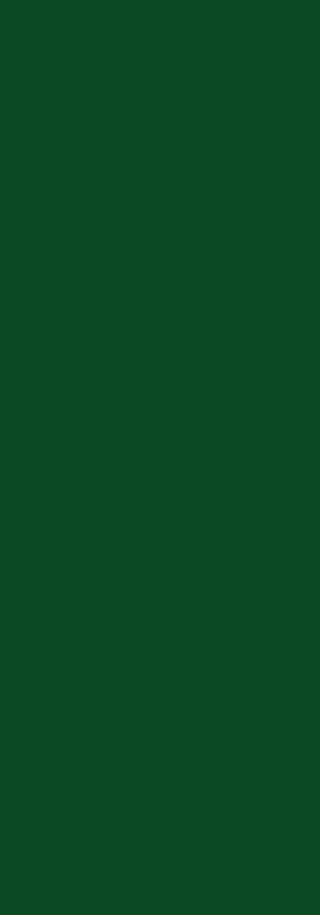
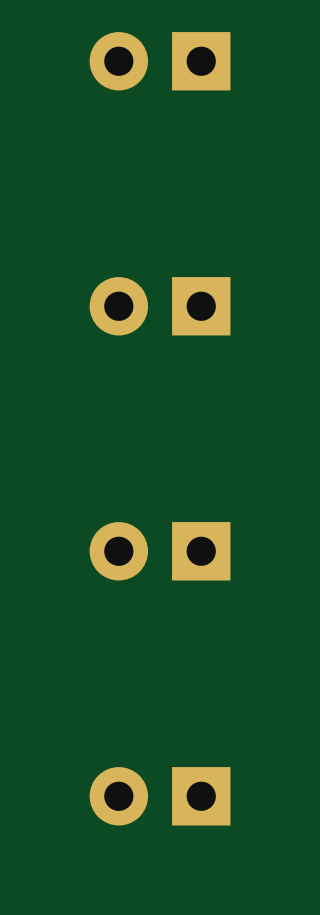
part: none -> (160, 61)
part: none -> (160, 306)
part: none -> (160, 551)
part: none -> (160, 796)

